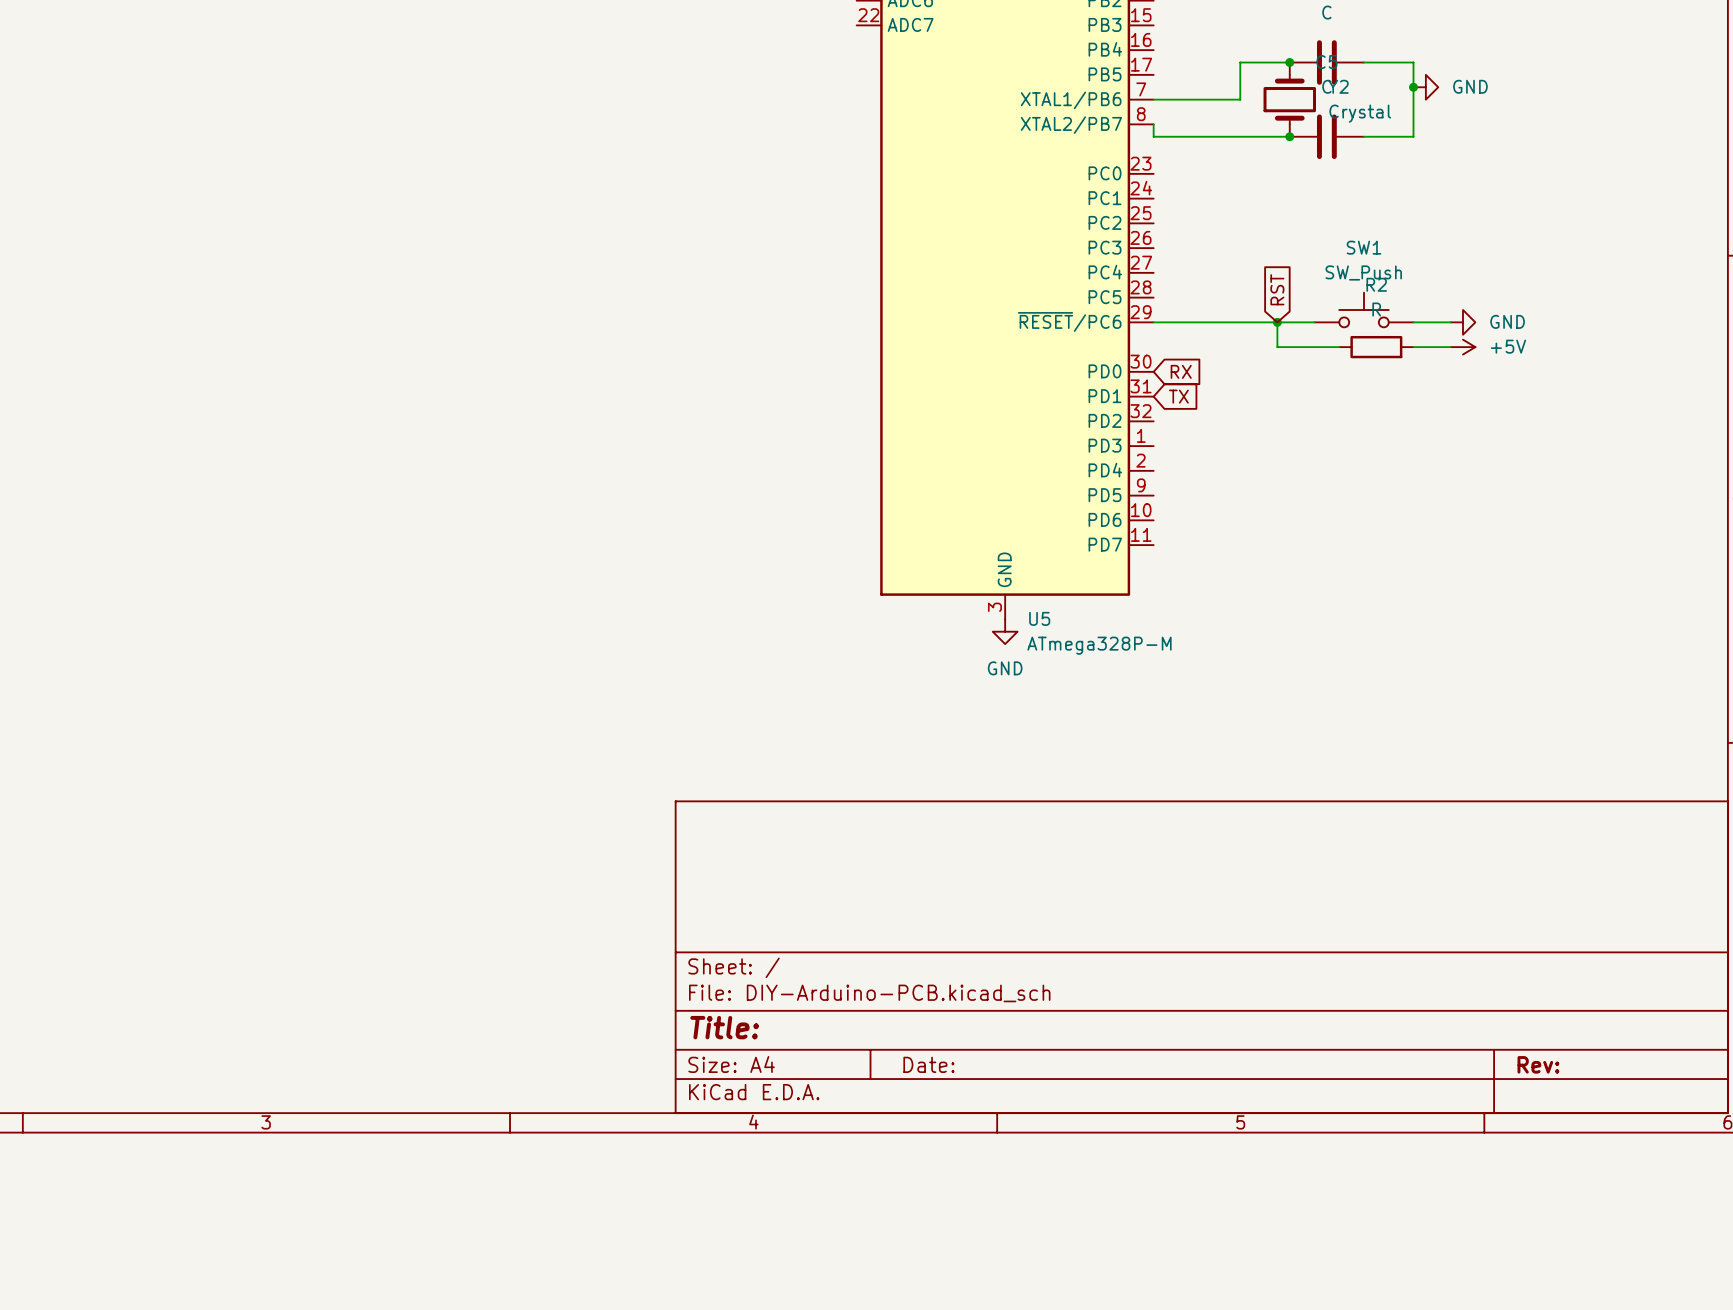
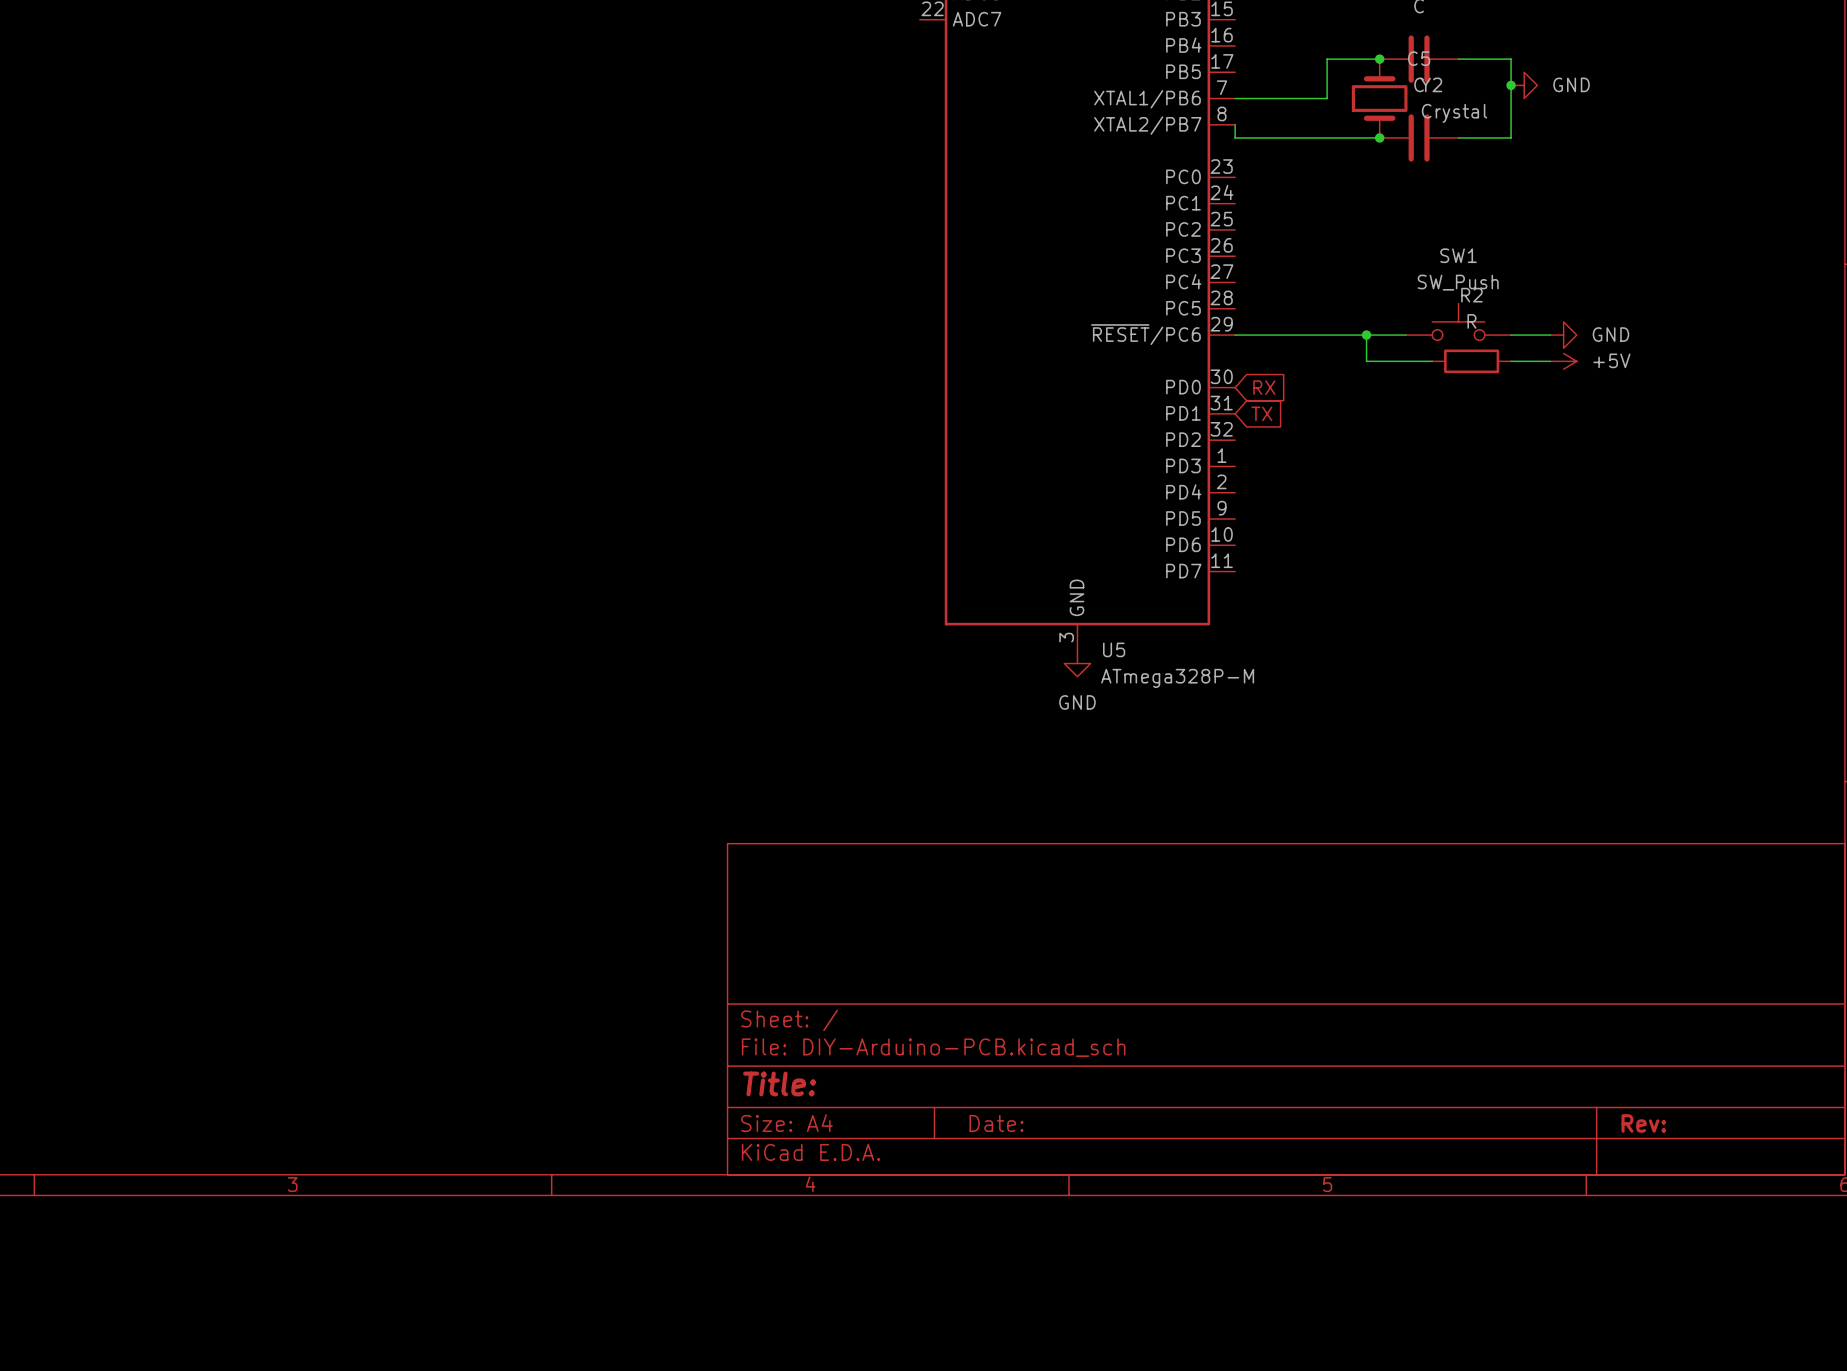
global label: RST (1277, 289) -> none

